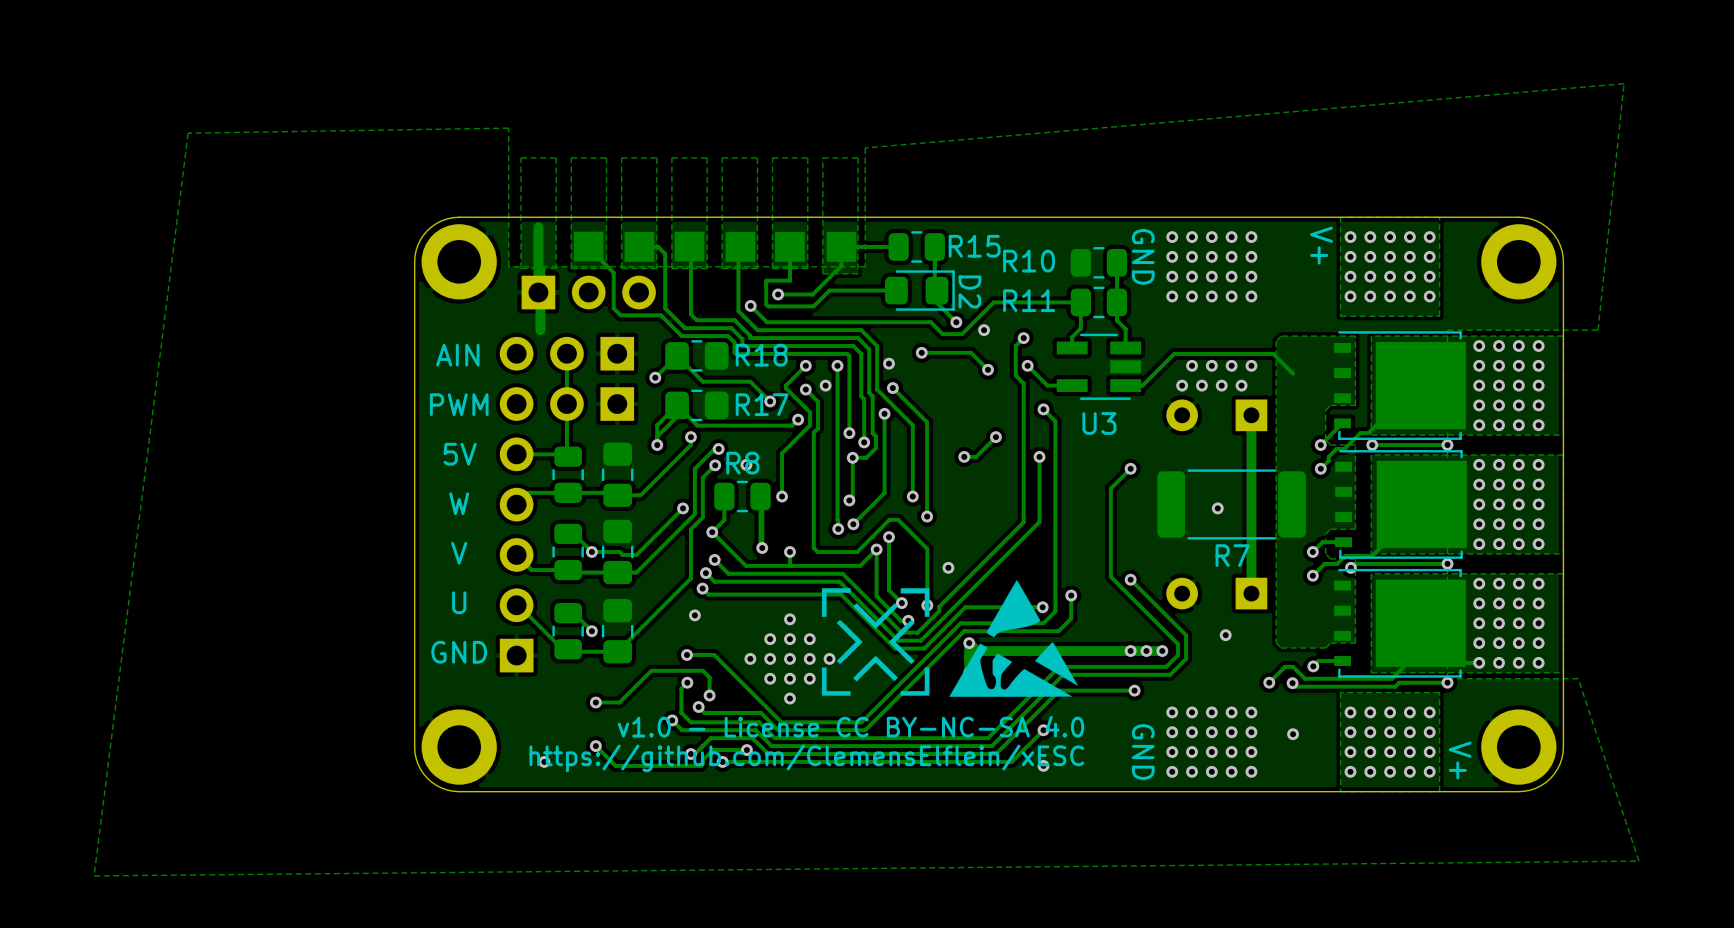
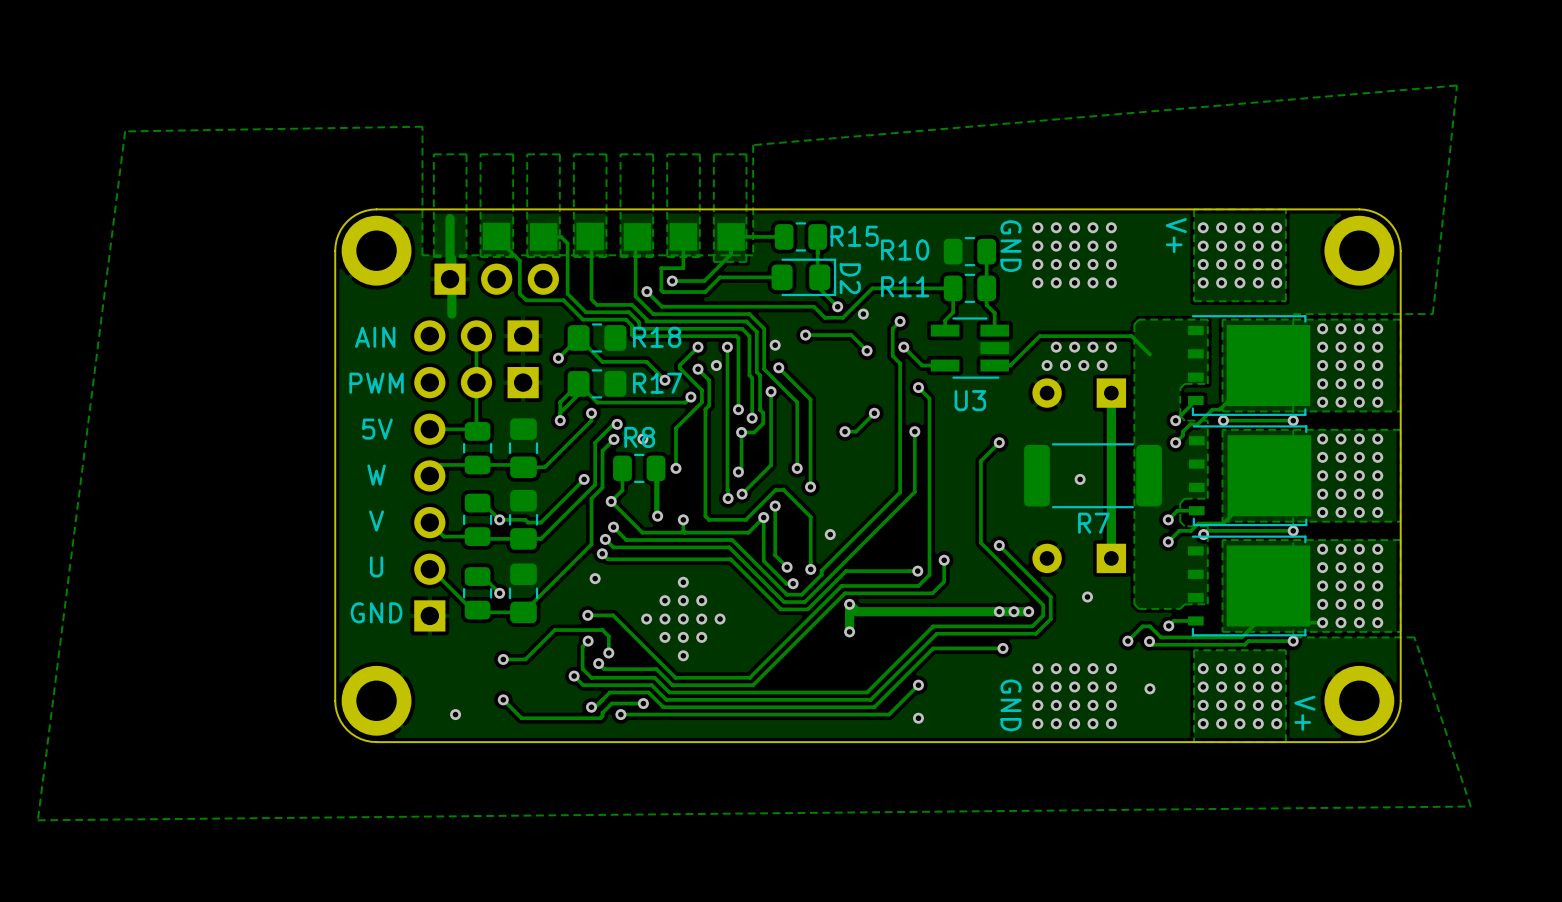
drawing: [821, 580, 1078, 697] -> none
text: v1.0 - License CC BY-NC-SA 4.0 (850, 726) -> none
text: https://github.com/ClemensElflein/xESC (806, 758) -> none

